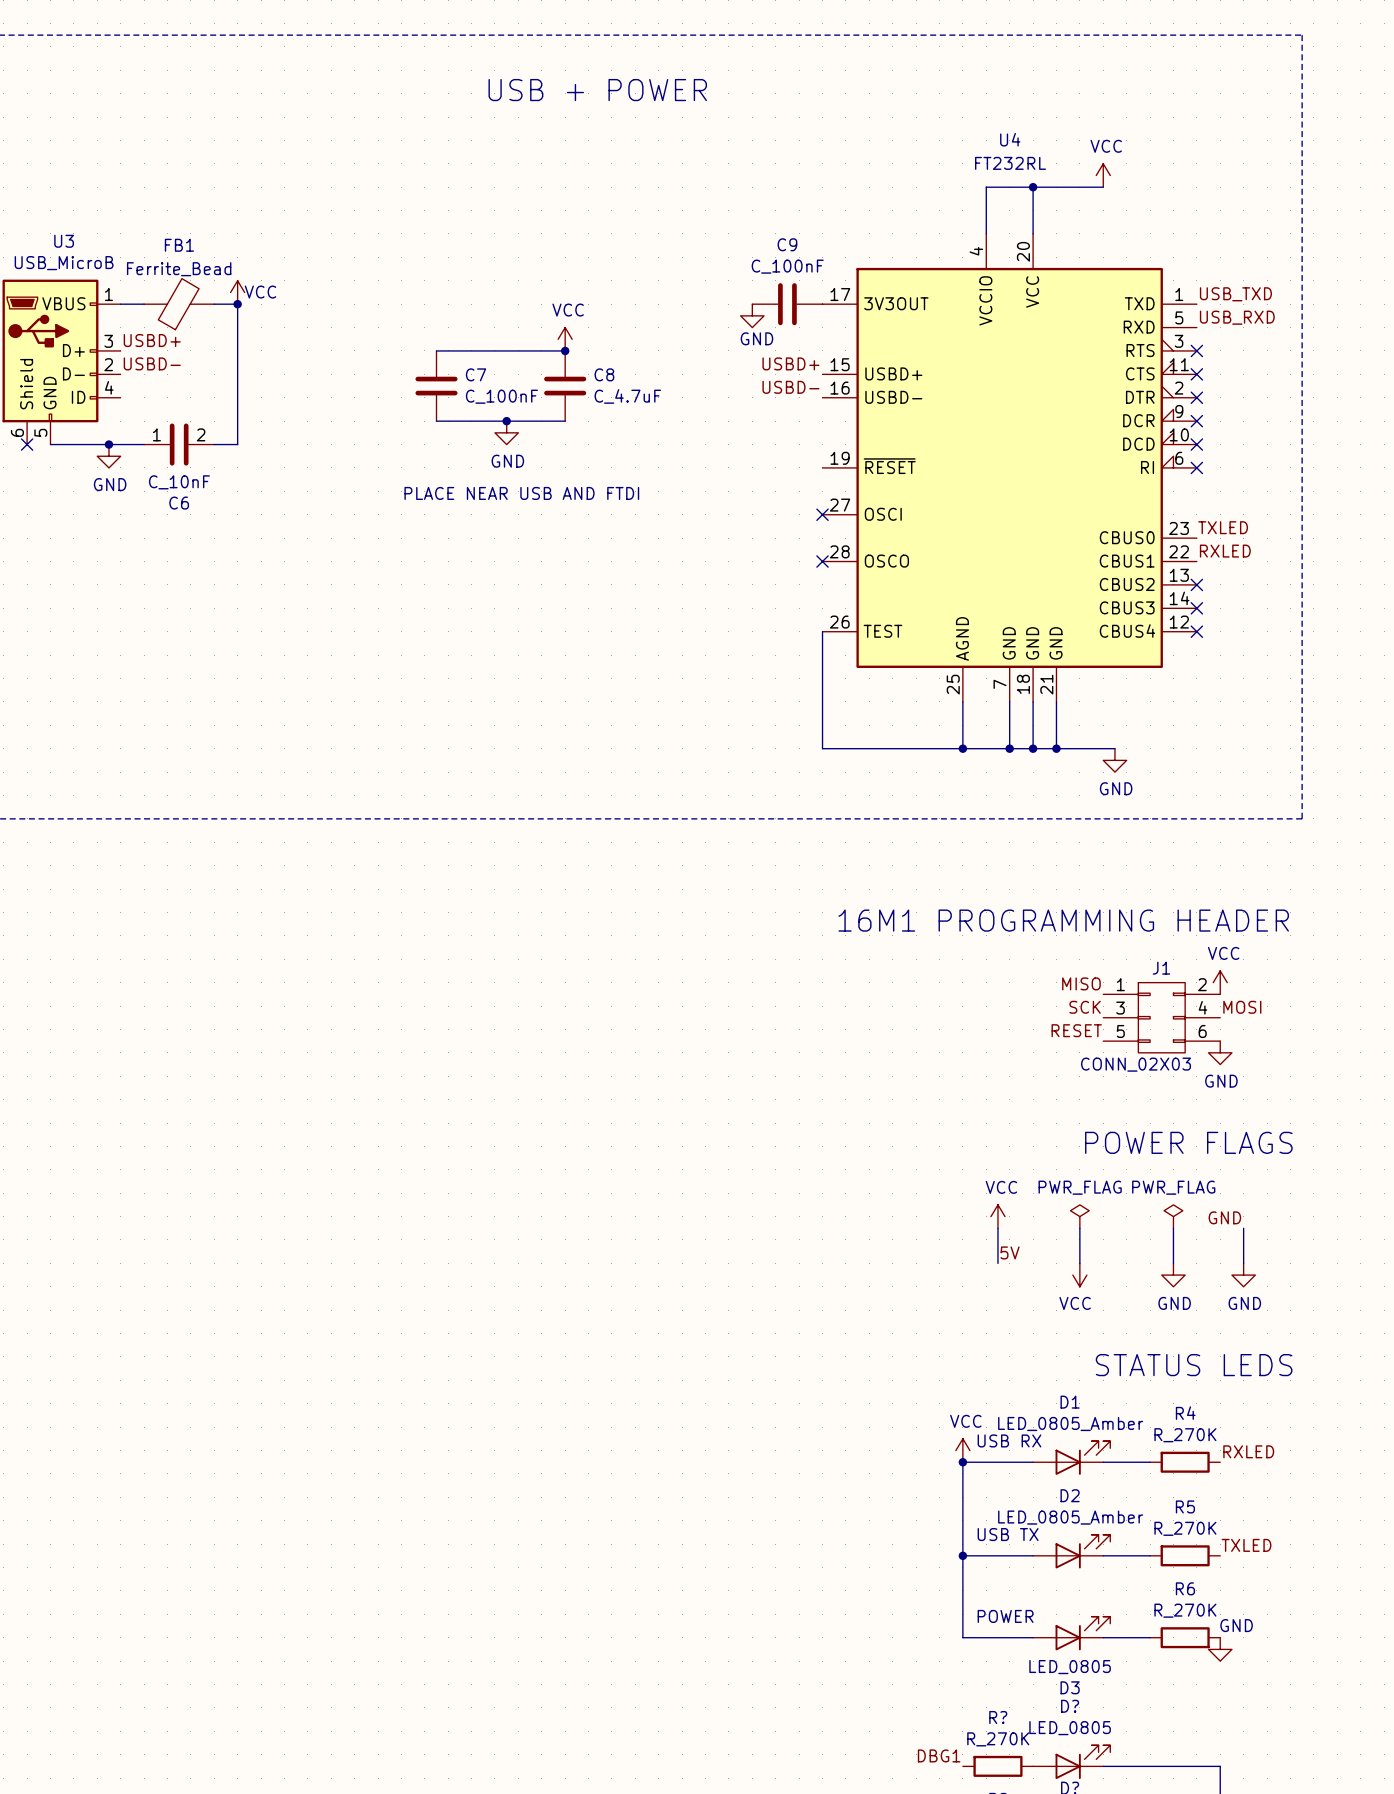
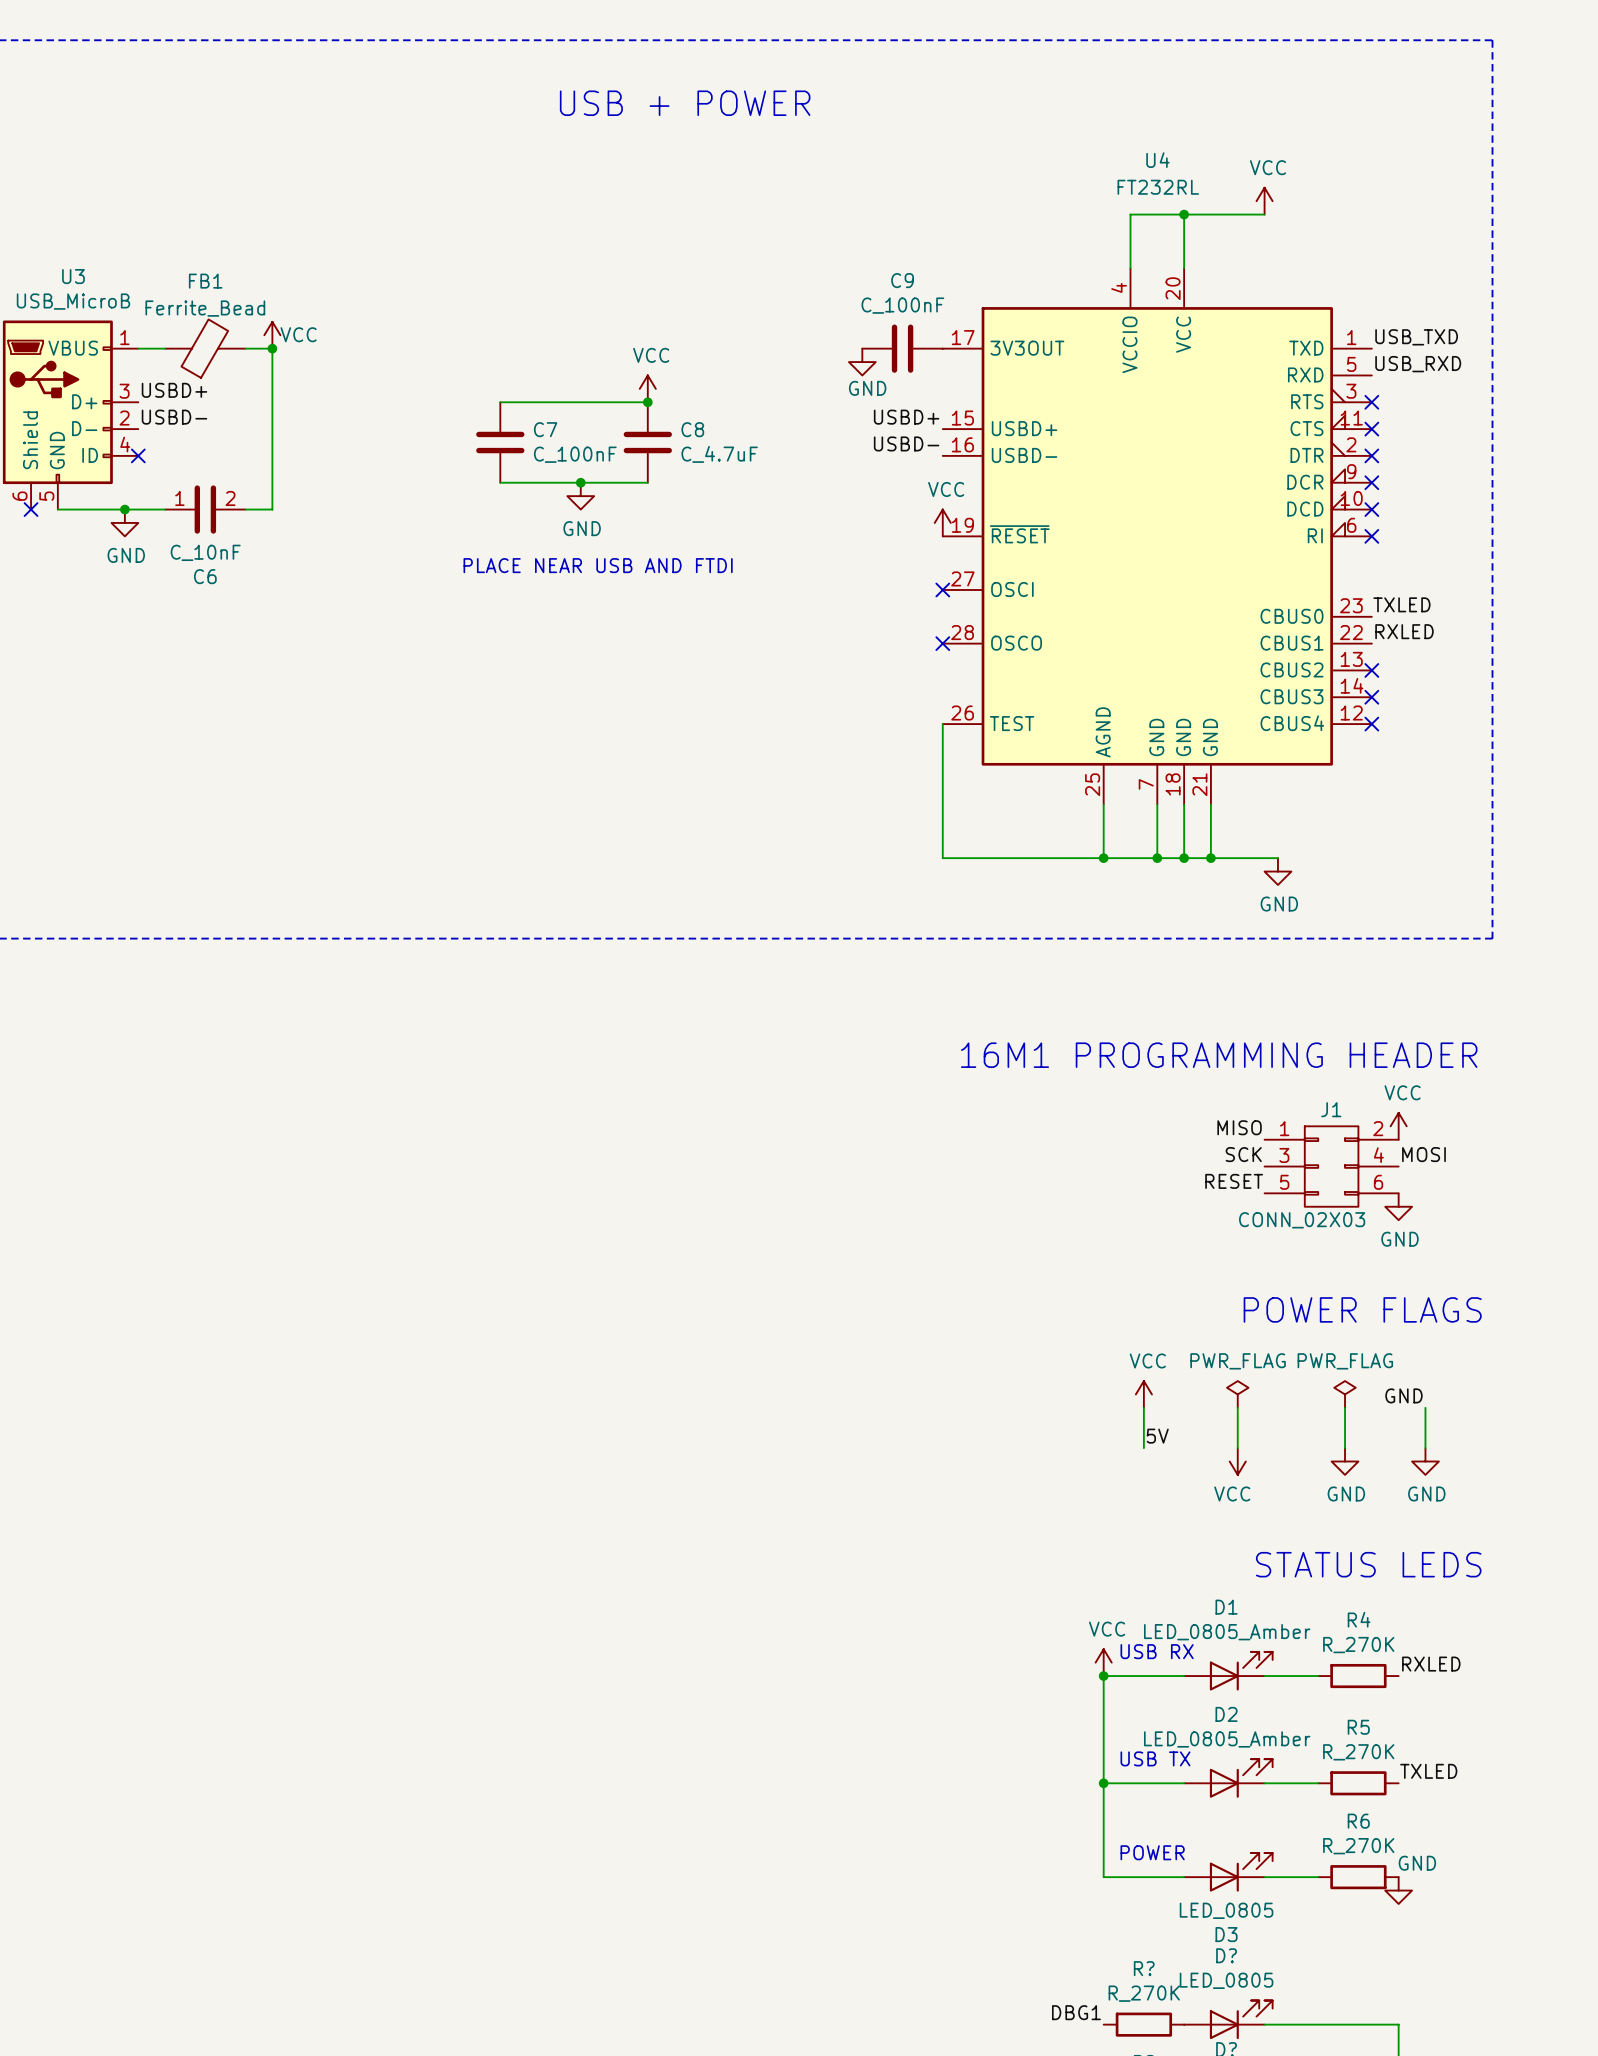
no-connect mark: none -> (138, 455)
power symbol: none -> VCC (942, 522)

